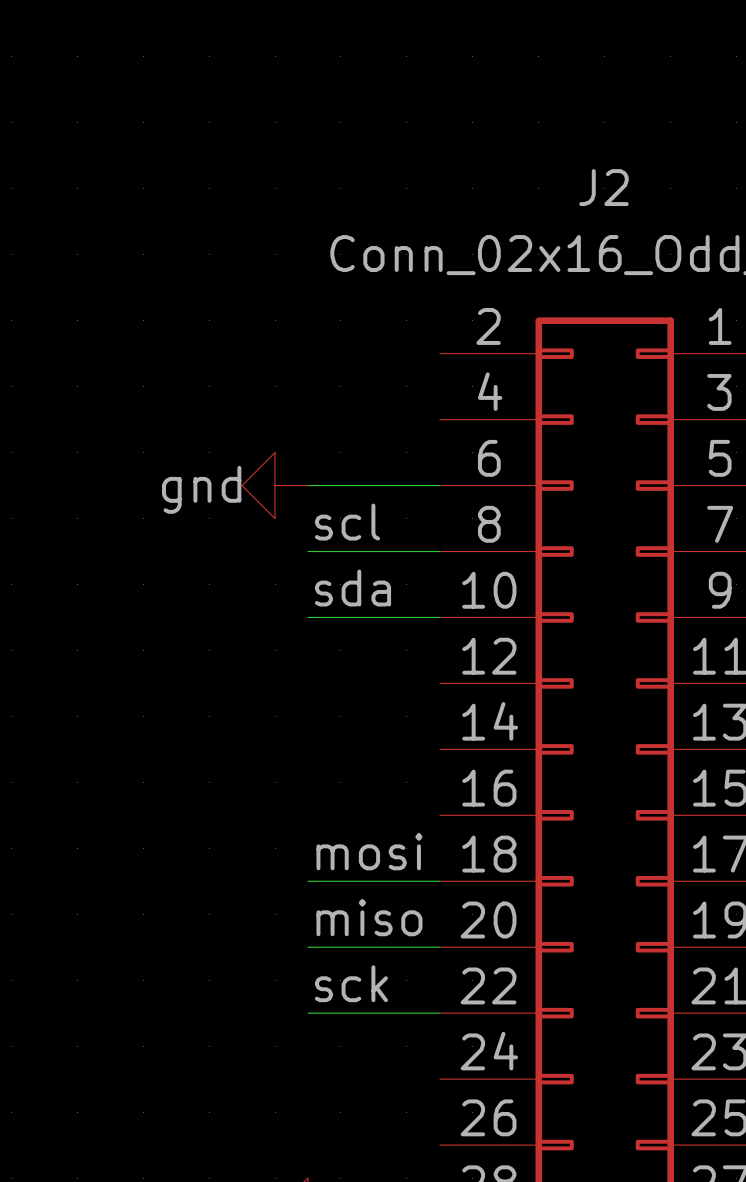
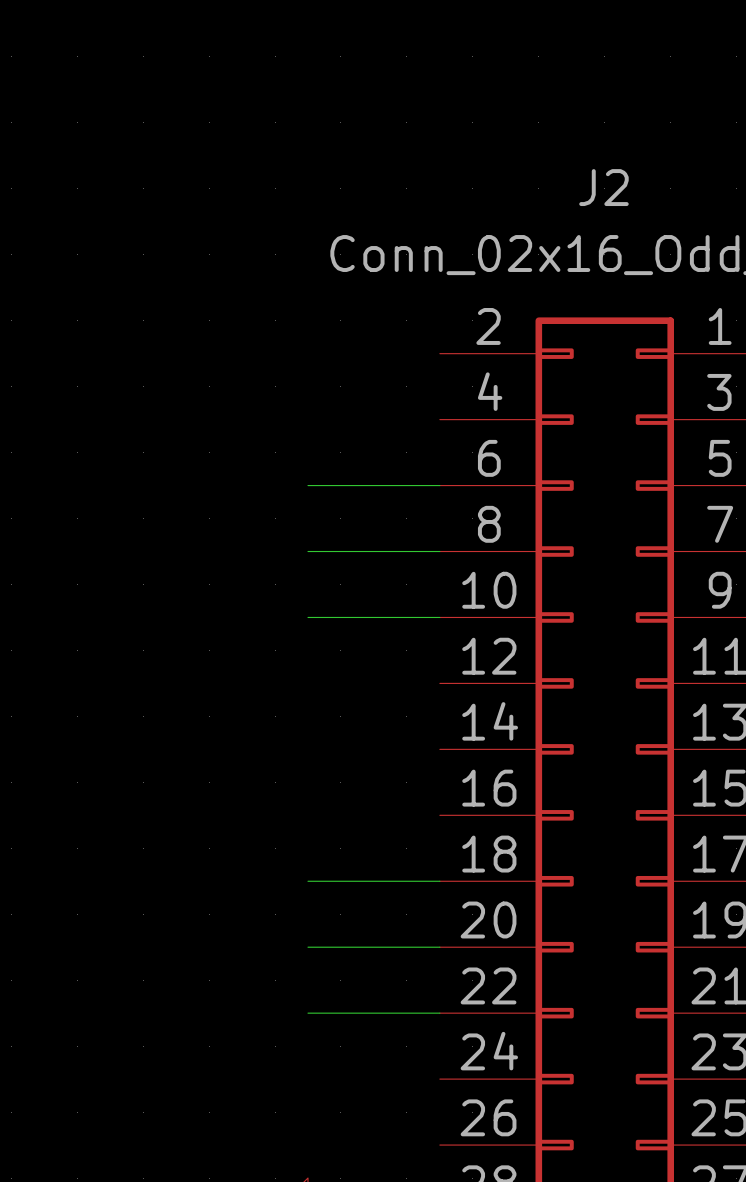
power symbol: gnd (275, 485) -> none
label: scl (347, 522) -> none
label: sda (352, 588) -> none
label: mosi (369, 851) -> none
label: miso (369, 917) -> none
label: sck (351, 983) -> none

